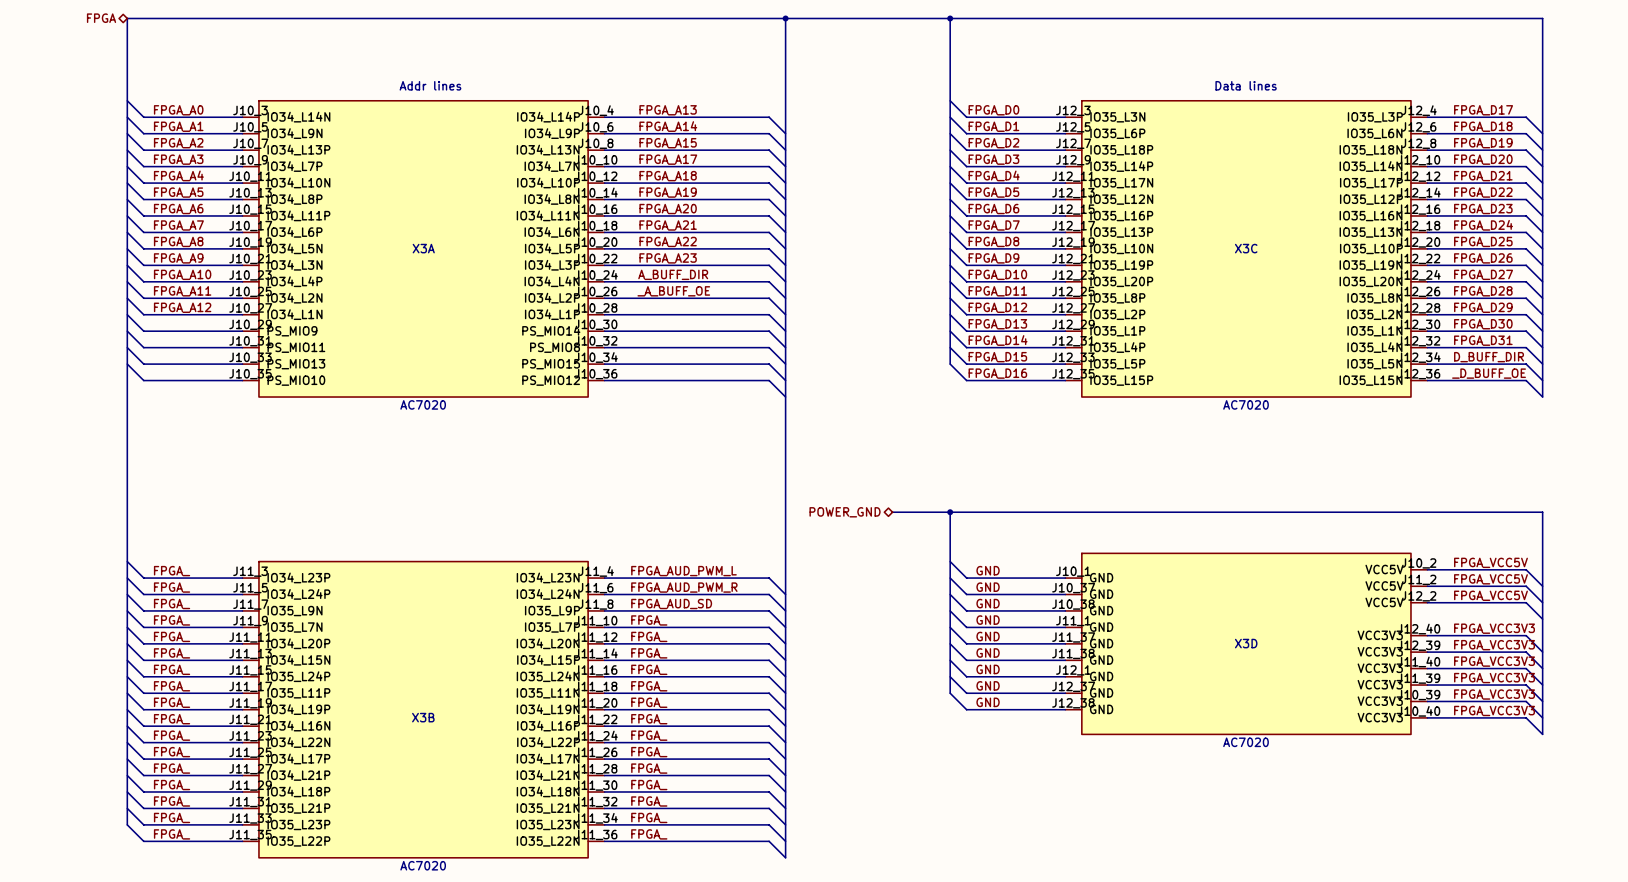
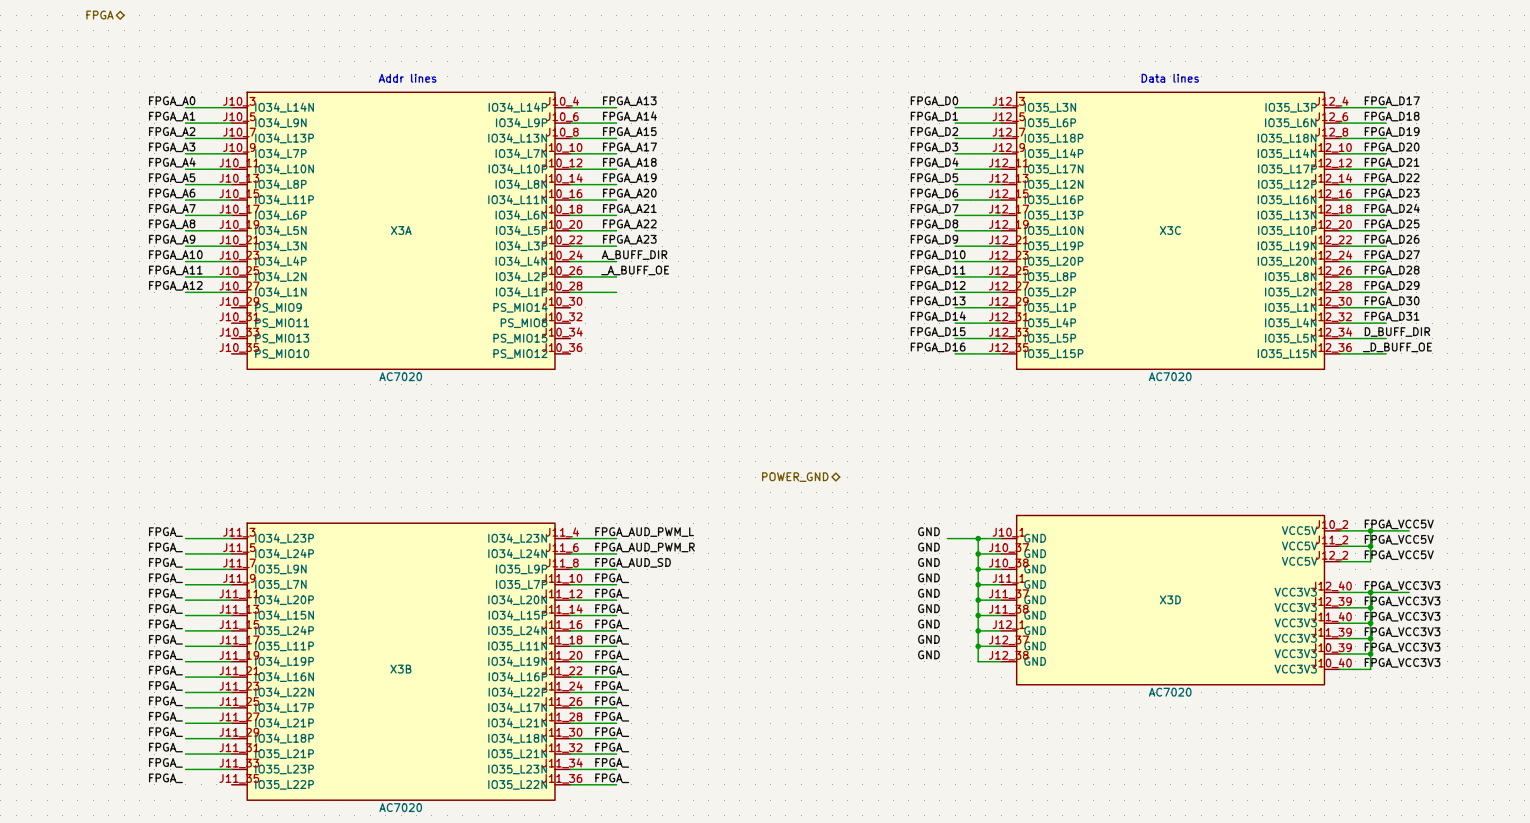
bus: (785, 18) (785, 857) -> none
junction: (785, 18) -> none
bus: (950, 18) (950, 364) -> none
junction: (950, 18) -> none
wire: (127, 100) (143, 117) (193, 117) -> none
wire: (950, 100) (966, 117) (1016, 117) -> none
wire: (127, 117) (143, 133) (193, 133) -> none
wire: (653, 117) (769, 117) (785, 133) -> none
wire: (950, 117) (966, 133) (1016, 133) -> none
wire: (1476, 117) (1526, 117) (1542, 133) -> none
wire: (127, 133) (143, 150) (193, 150) -> none
wire: (653, 133) (769, 133) (785, 150) -> none
wire: (950, 133) (966, 150) (1016, 150) -> none
wire: (1476, 133) (1526, 133) (1542, 150) -> none
wire: (127, 150) (143, 166) (193, 166) -> none
wire: (653, 150) (769, 150) (785, 166) -> none
wire: (950, 150) (966, 166) (1016, 166) -> none
wire: (1476, 150) (1526, 150) (1542, 166) -> none
wire: (127, 166) (143, 183) (193, 183) -> none
wire: (653, 166) (769, 166) (785, 183) -> none
wire: (950, 166) (966, 183) (1016, 183) -> none
wire: (1476, 166) (1526, 166) (1542, 183) -> none
wire: (127, 183) (143, 199) (193, 199) -> none
wire: (653, 183) (769, 183) (785, 199) -> none
wire: (950, 183) (966, 199) (1016, 199) -> none
wire: (1476, 183) (1526, 183) (1542, 199) -> none
wire: (127, 199) (143, 215) (193, 215) -> none
wire: (653, 199) (769, 199) (785, 215) -> none
wire: (950, 199) (966, 215) (1016, 215) -> none
wire: (1476, 199) (1526, 199) (1542, 215) -> none
wire: (127, 215) (143, 232) (193, 232) -> none
wire: (653, 215) (769, 215) (785, 232) -> none
wire: (950, 215) (966, 232) (1016, 232) -> none
wire: (1476, 215) (1526, 215) (1542, 232) -> none
wire: (127, 232) (143, 248) (193, 248) -> none
wire: (653, 232) (769, 232) (785, 248) -> none
wire: (950, 232) (966, 248) (1016, 248) -> none
wire: (1476, 232) (1526, 232) (1542, 248) -> none
wire: (127, 248) (143, 265) (193, 265) -> none
wire: (653, 248) (769, 248) (785, 265) -> none
wire: (950, 248) (966, 265) (1016, 265) -> none
wire: (1476, 248) (1526, 248) (1542, 265) -> none
wire: (127, 265) (143, 281) (193, 281) -> none
wire: (653, 265) (769, 265) (785, 281) -> none
wire: (950, 265) (966, 281) (1016, 281) -> none
wire: (1476, 265) (1526, 265) (1542, 281) -> none
wire: (127, 281) (143, 298) (193, 298) -> none
wire: (653, 281) (769, 281) (785, 298) -> none
wire: (950, 281) (966, 298) (1016, 298) -> none
wire: (1476, 281) (1526, 281) (1542, 298) -> none
wire: (127, 298) (143, 314) (193, 314) -> none
wire: (653, 298) (769, 298) (785, 314) -> none
wire: (950, 298) (966, 314) (1016, 314) -> none
wire: (1476, 298) (1526, 298) (1542, 314) -> none
wire: (127, 314) (143, 331) (242, 331) -> none
wire: (653, 314) (769, 314) (785, 331) -> none
wire: (950, 314) (966, 331) (1016, 331) -> none
wire: (1476, 314) (1526, 314) (1542, 331) -> none
wire: (127, 331) (143, 347) (242, 347) -> none
wire: (604, 331) (769, 331) (785, 347) -> none
wire: (950, 331) (966, 347) (1016, 347) -> none
wire: (1476, 331) (1526, 331) (1542, 347) -> none
wire: (127, 347) (143, 364) (242, 364) -> none
wire: (604, 347) (769, 347) (785, 364) -> none
wire: (950, 347) (966, 364) (1016, 364) -> none
wire: (1476, 347) (1526, 347) (1542, 364) -> none
wire: (127, 364) (143, 380) (242, 380) -> none
wire: (604, 364) (769, 364) (785, 380) -> none
wire: (950, 364) (966, 380) (1016, 380) -> none
wire: (1476, 364) (1526, 364) (1542, 380) -> none
wire: (604, 380) (769, 380) (785, 397) -> none
wire: (1476, 380) (1526, 380) (1542, 397) -> none
bus: (1542, 397) (1542, 18) (127, 18) (127, 824) -> none
bus: (892, 512) (1542, 512) (1542, 734) -> none
bus: (950, 512) (950, 693) -> none
junction: (950, 512) -> none
wire: (127, 561) (143, 578) (193, 578) -> none
wire: (950, 561) (966, 578) (1007, 578) -> none
junction: none -> (1370, 530)
wire: (1501, 569) (1526, 569) (1542, 586) -> none
wire: (127, 578) (143, 594) (193, 594) -> none
wire: (653, 578) (769, 578) (785, 594) -> none
wire: (950, 578) (966, 594) (1040, 594) -> none
junction: none -> (978, 538)
wire: (1460, 586) (1526, 586) (1542, 602) -> none
junction: none -> (1370, 546)
wire: (127, 594) (143, 610) (193, 610) -> none
wire: (653, 594) (769, 594) (785, 610) -> none
wire: (950, 594) (966, 610) (1040, 610) -> none
junction: none -> (978, 553)
wire: (1460, 602) (1526, 602) (1542, 619) -> (1370, 561) (1370, 530)
wire: (127, 610) (143, 627) (193, 627) -> none
wire: (653, 610) (769, 610) (785, 627) -> none
wire: (950, 610) (966, 627) (1040, 627) -> none
junction: none -> (978, 569)
wire: (127, 627) (143, 643) (193, 643) -> none
wire: (653, 627) (769, 627) (785, 643) -> none
wire: (950, 627) (966, 643) (1040, 643) -> none
junction: none -> (978, 584)
junction: none -> (1370, 592)
wire: (1501, 635) (1526, 635) (1542, 652) -> none
wire: (127, 643) (143, 660) (193, 660) -> none
wire: (653, 643) (769, 643) (785, 660) -> none
wire: (950, 643) (966, 660) (1040, 660) -> none
junction: none -> (978, 600)
wire: (1460, 652) (1526, 652) (1542, 668) -> none
junction: none -> (1370, 607)
wire: (127, 660) (143, 676) (193, 676) -> none
wire: (653, 660) (769, 660) (785, 676) -> none
wire: (950, 660) (966, 676) (1040, 676) -> none
junction: none -> (978, 615)
wire: (1460, 668) (1526, 668) (1542, 685) -> none
junction: none -> (1370, 623)
wire: (127, 676) (143, 693) (193, 693) -> none
wire: (653, 676) (769, 676) (785, 693) -> none
wire: (950, 676) (966, 693) (1040, 693) -> none
junction: none -> (978, 630)
wire: (1460, 685) (1526, 685) (1542, 701) -> none
junction: none -> (1370, 638)
wire: (127, 693) (143, 709) (193, 709) -> none
wire: (653, 693) (769, 693) (785, 709) -> none
wire: (950, 693) (966, 709) (1040, 709) -> (978, 538) (978, 661)
junction: none -> (978, 646)
wire: (1460, 701) (1526, 701) (1542, 717) -> none
junction: none -> (1370, 654)
wire: (127, 709) (143, 726) (193, 726) -> none
wire: (653, 709) (769, 709) (785, 726) -> none
wire: (1460, 717) (1526, 717) (1542, 734) -> (1370, 669) (1370, 592)
wire: (127, 726) (143, 742) (193, 742) -> none
wire: (653, 726) (769, 726) (785, 742) -> none
wire: (127, 742) (143, 759) (193, 759) -> none
wire: (653, 742) (769, 742) (785, 759) -> none
wire: (127, 759) (143, 775) (193, 775) -> none
wire: (653, 759) (769, 759) (785, 775) -> none
wire: (127, 775) (143, 791) (193, 791) -> none
wire: (653, 775) (769, 775) (785, 791) -> none
wire: (127, 791) (143, 808) (193, 808) -> none
wire: (653, 791) (769, 791) (785, 808) -> none
wire: (127, 808) (143, 824) (193, 824) -> none
wire: (653, 808) (769, 808) (785, 824) -> none
wire: (127, 824) (143, 841) (242, 841) -> none
wire: (653, 824) (769, 824) (785, 841) -> none
wire: (653, 841) (769, 841) (785, 857) -> none

